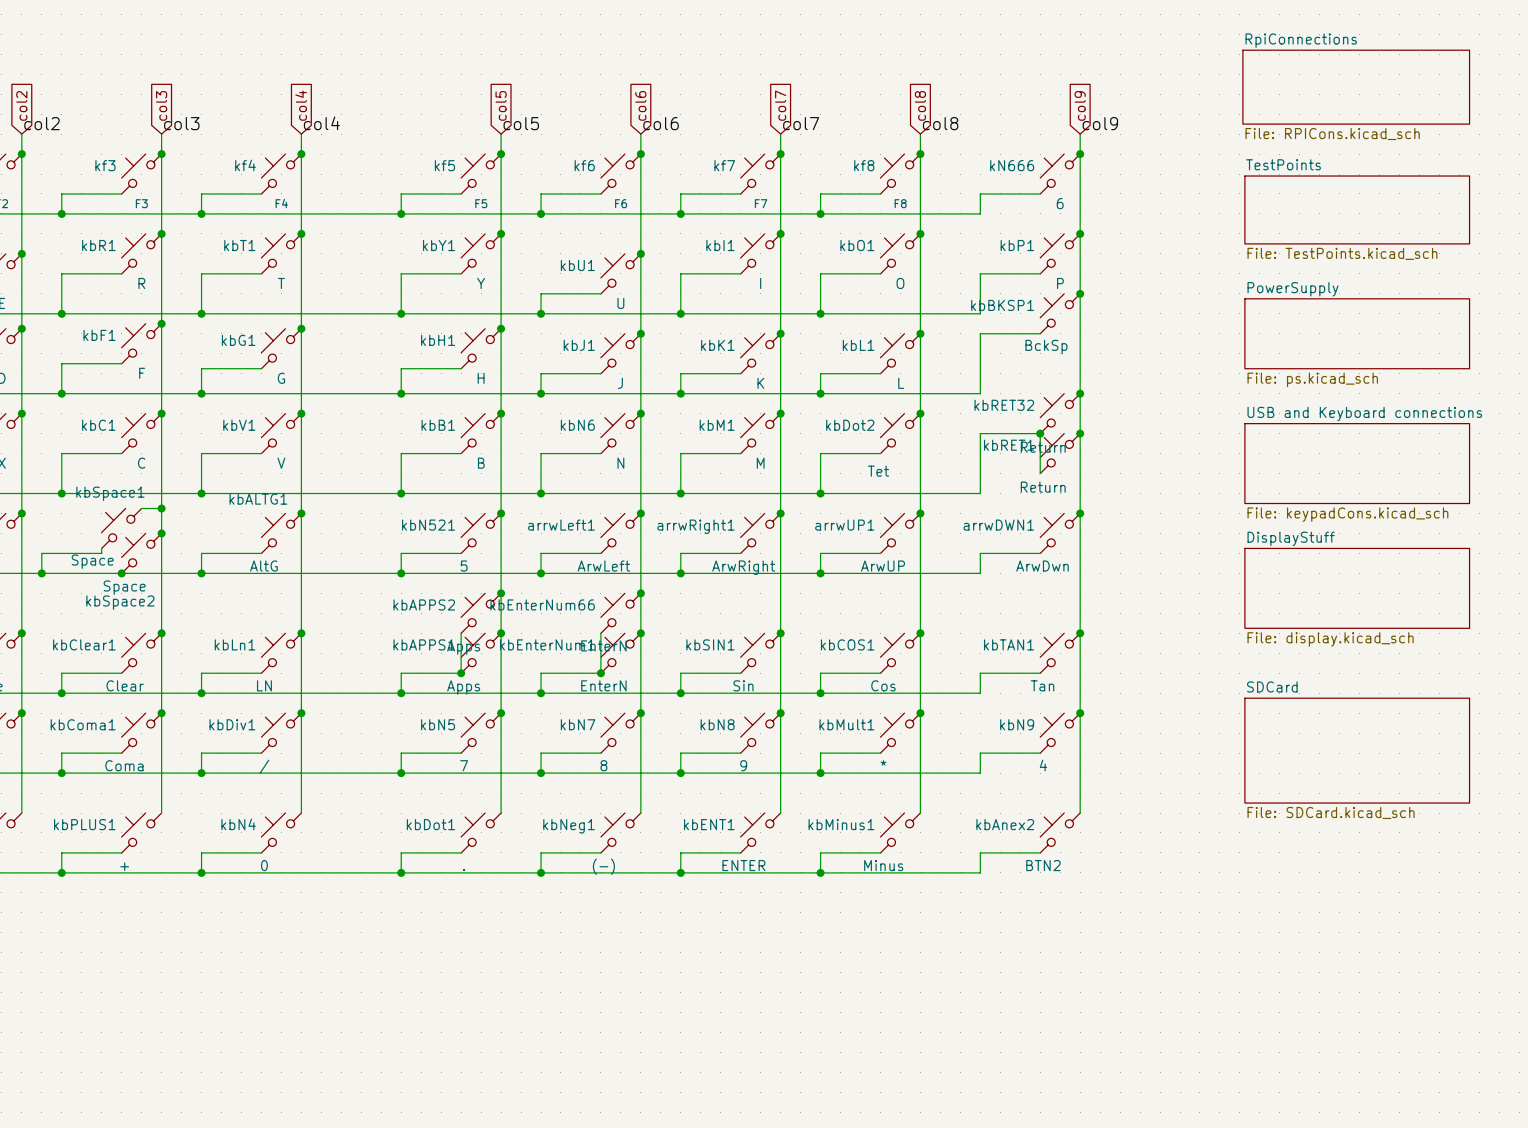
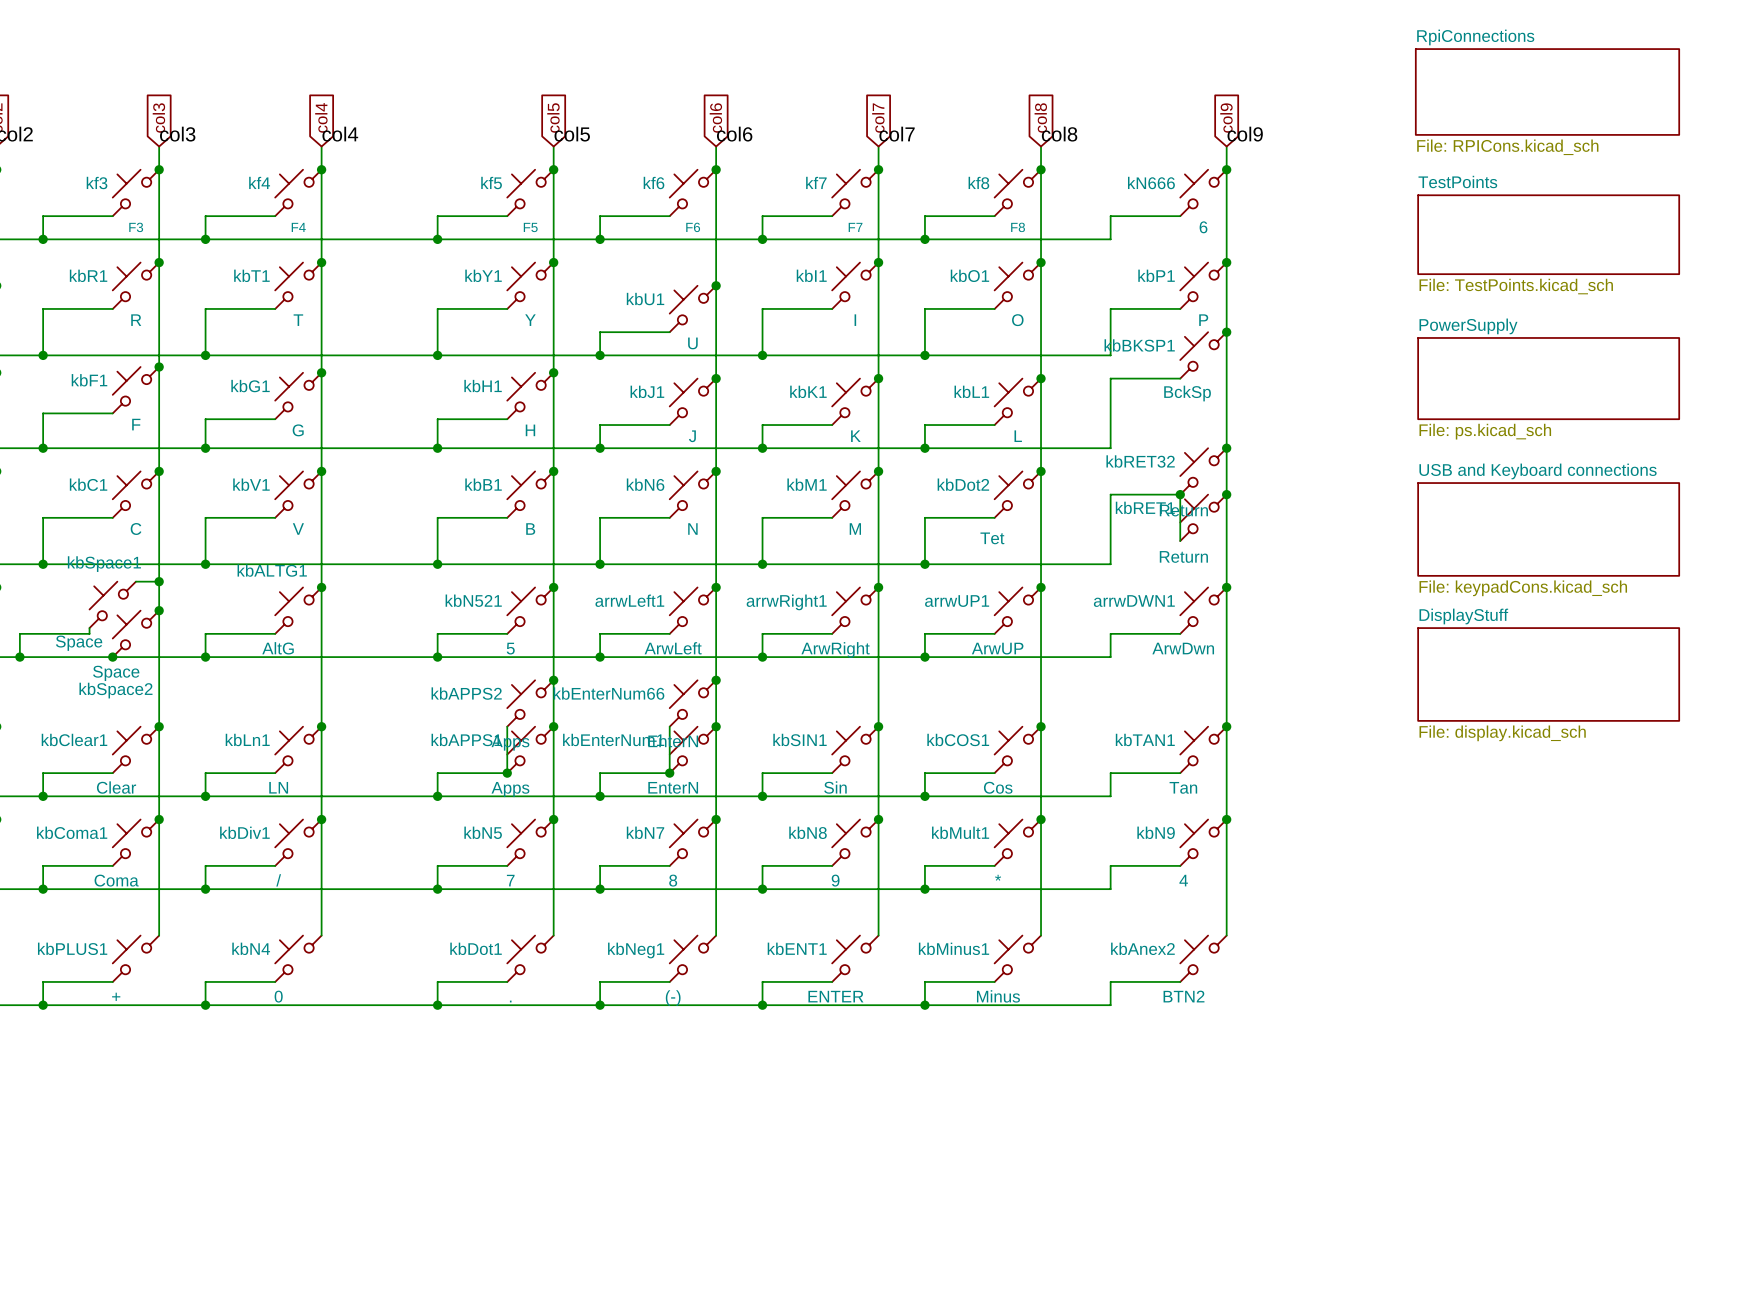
sheet SDCard: File: SDCard.kicad_sch (1357, 750) -> none

